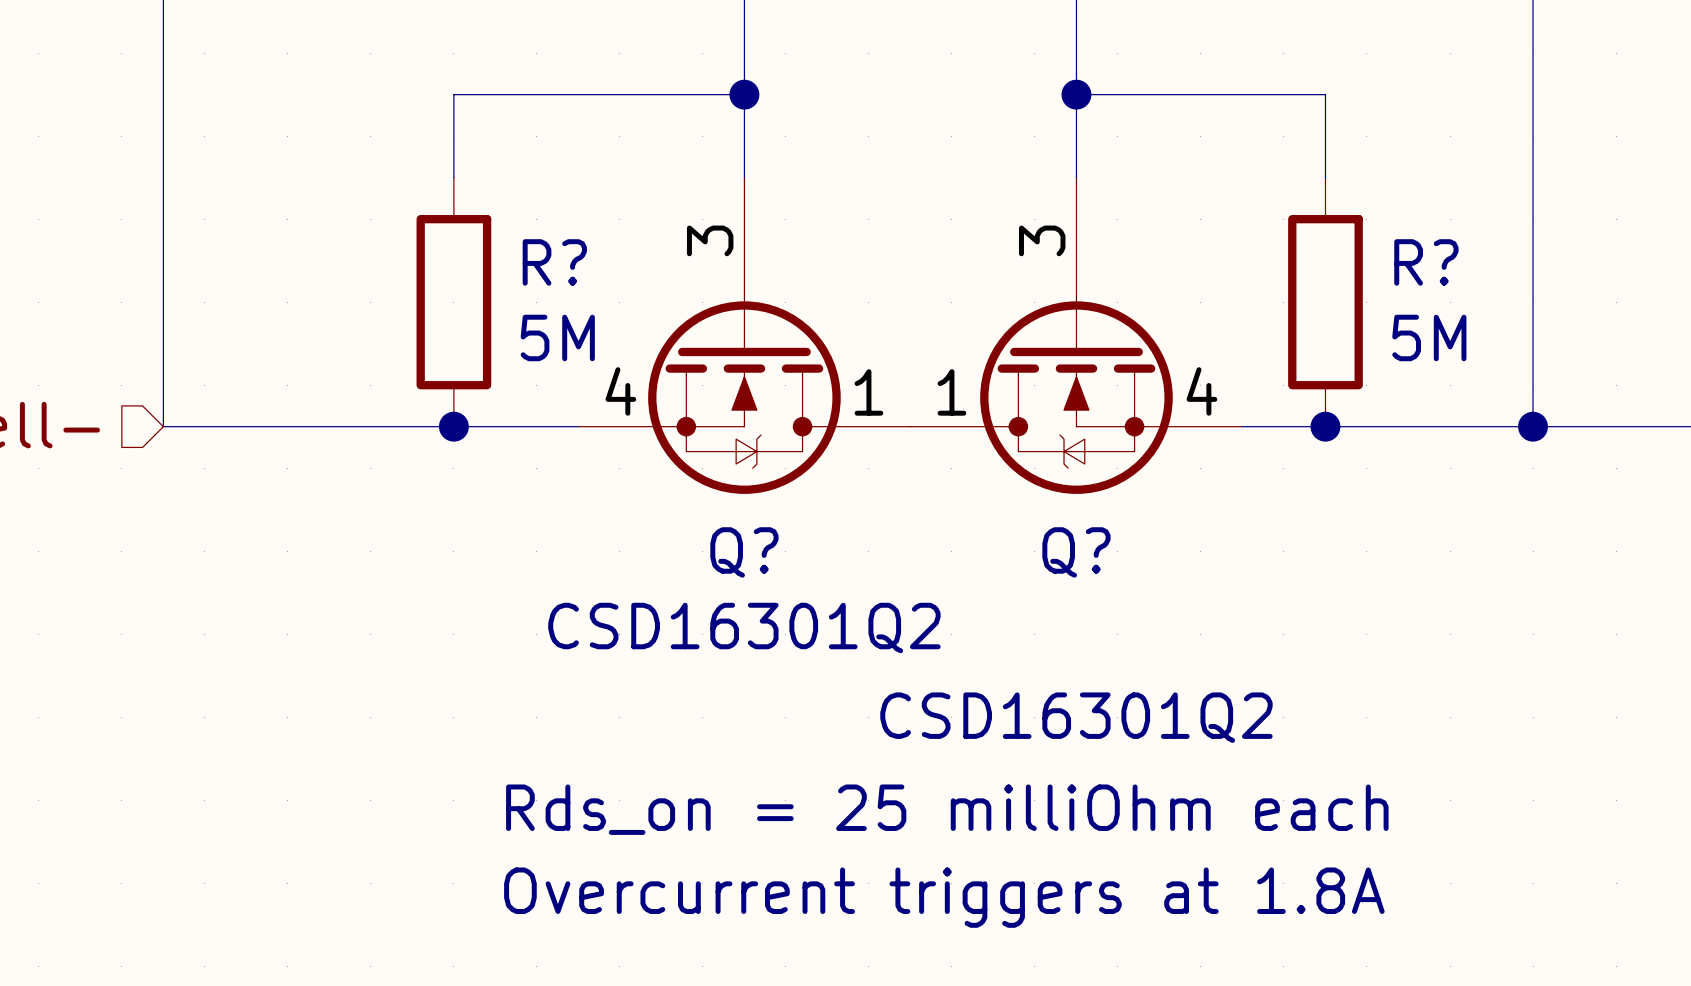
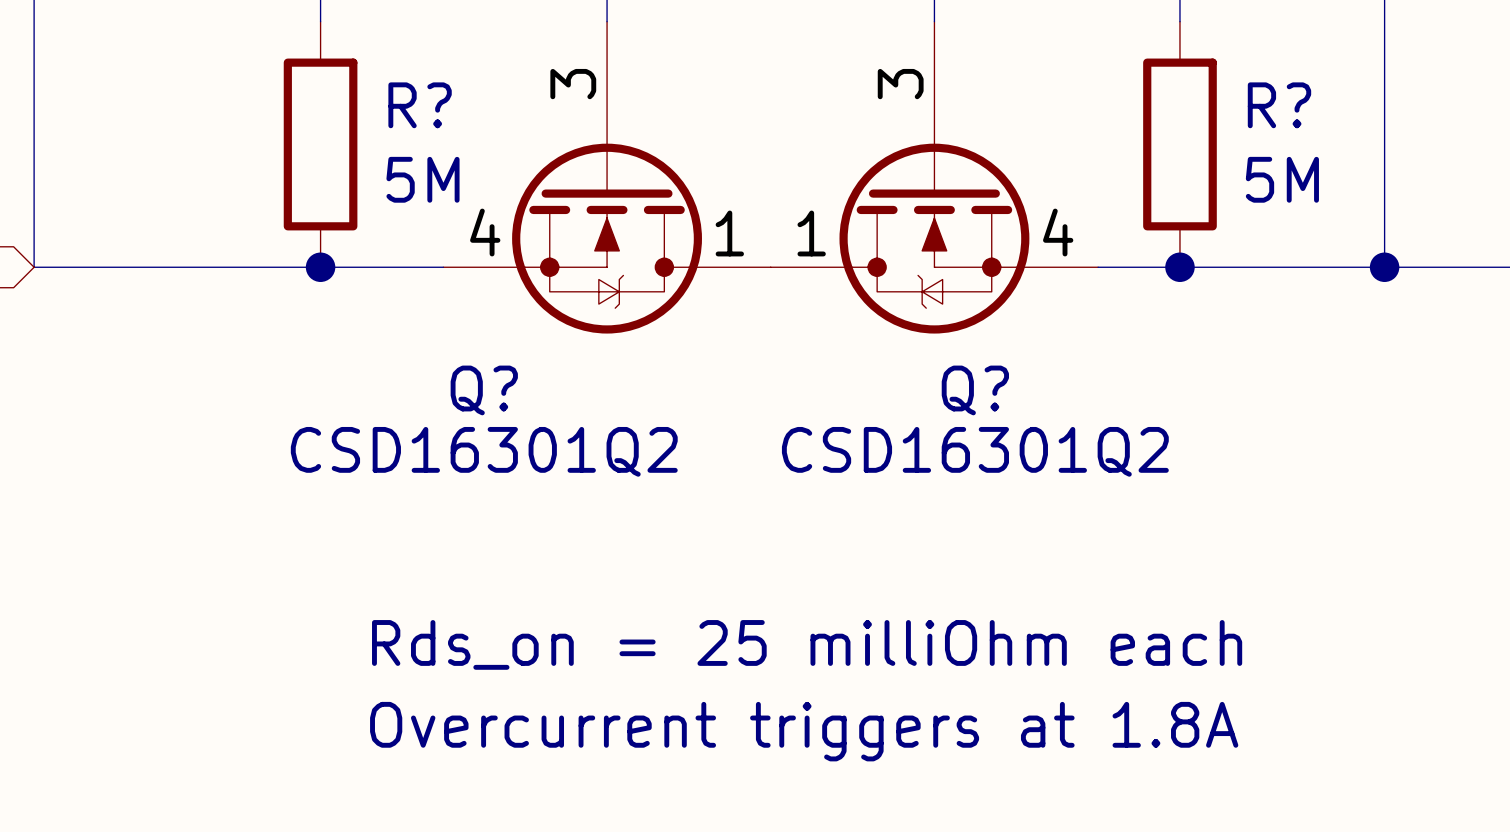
Q? name position: Q? (744, 552) -> Q? (484, 390)
Q? name position: Q? (1076, 552) -> Q? (975, 390)
Q? value position: CSD16301Q2 (744, 627) -> CSD16301Q2 (484, 451)
Q? value position: CSD16301Q2 (1076, 717) -> CSD16301Q2 (975, 451)

